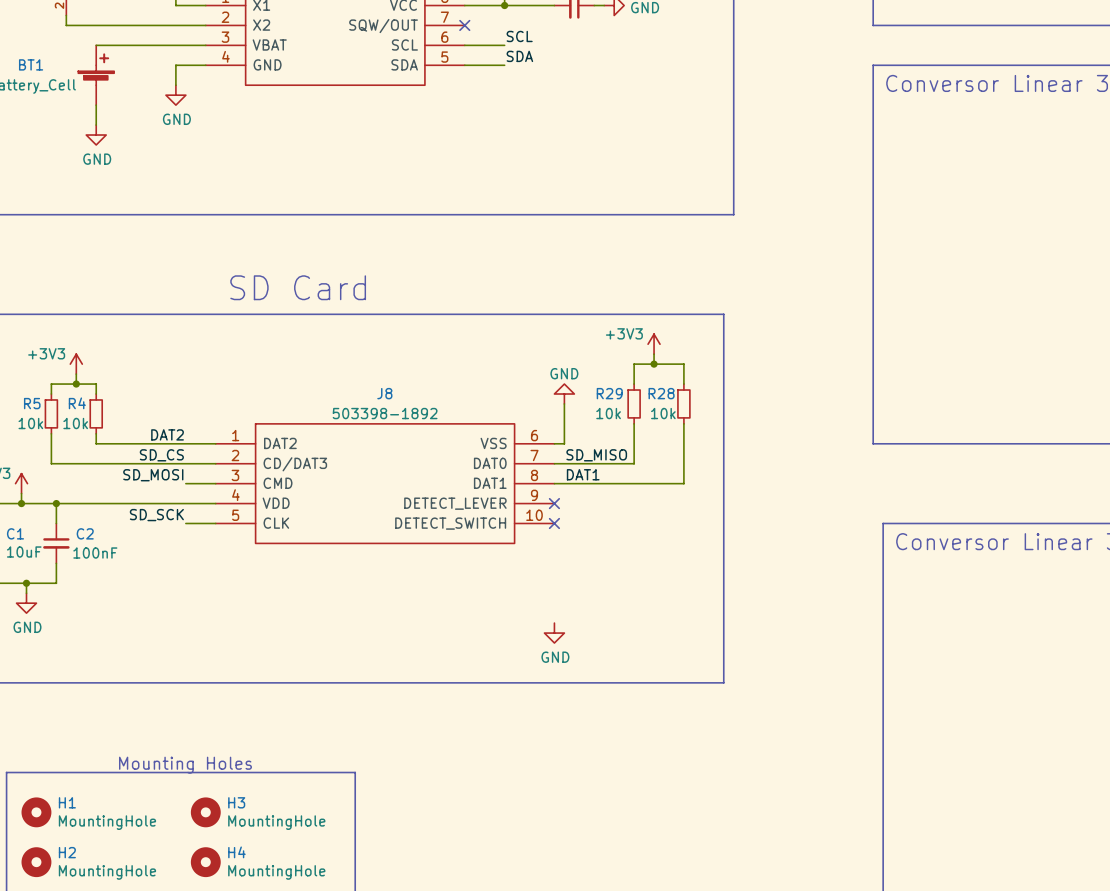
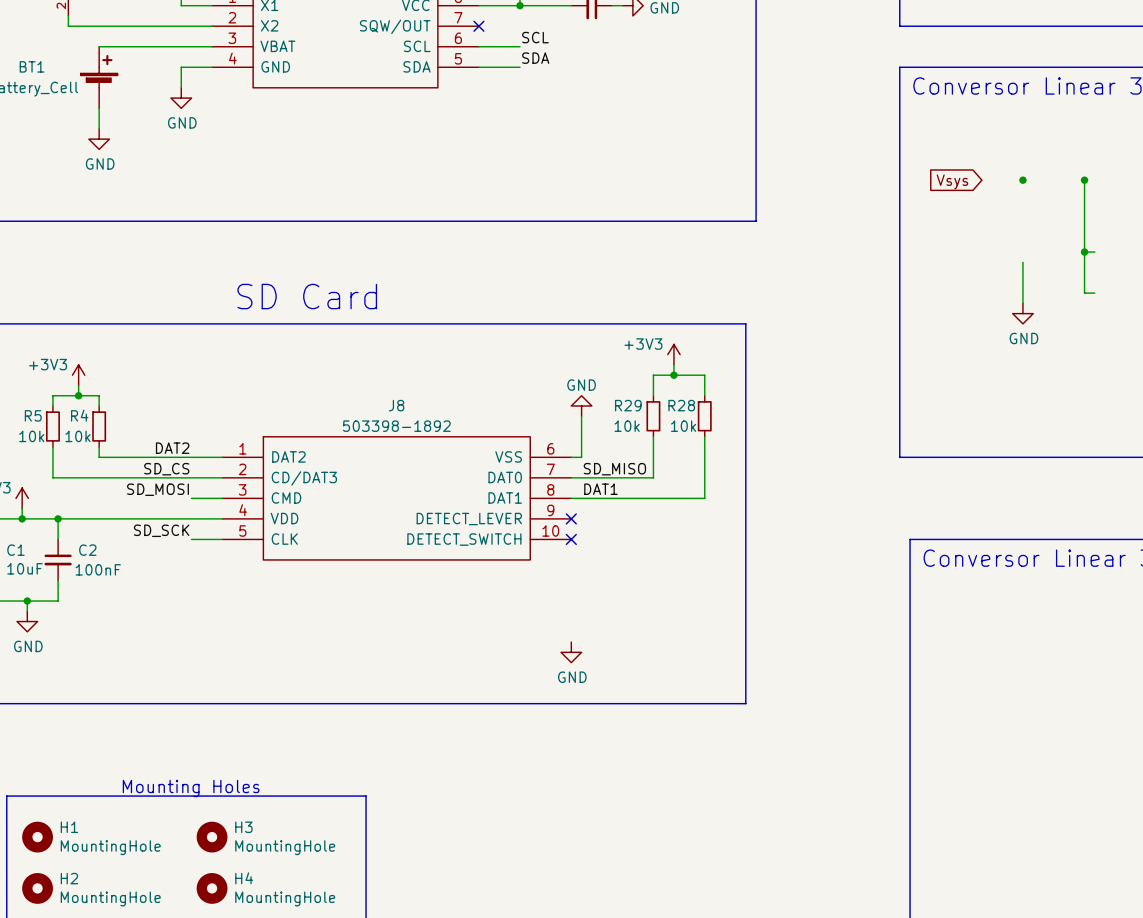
junction: none -> (1022, 180)
wire: none -> (1084, 180) (1084, 293) (1094, 293)
junction: none -> (1084, 180)
global label: none -> Vsys (952, 181)
wire: none -> (1084, 252) (1094, 252)
junction: none -> (1084, 252)
wire: none -> (1022, 262) (1022, 303)
power symbol: none -> GND (1022, 313)

